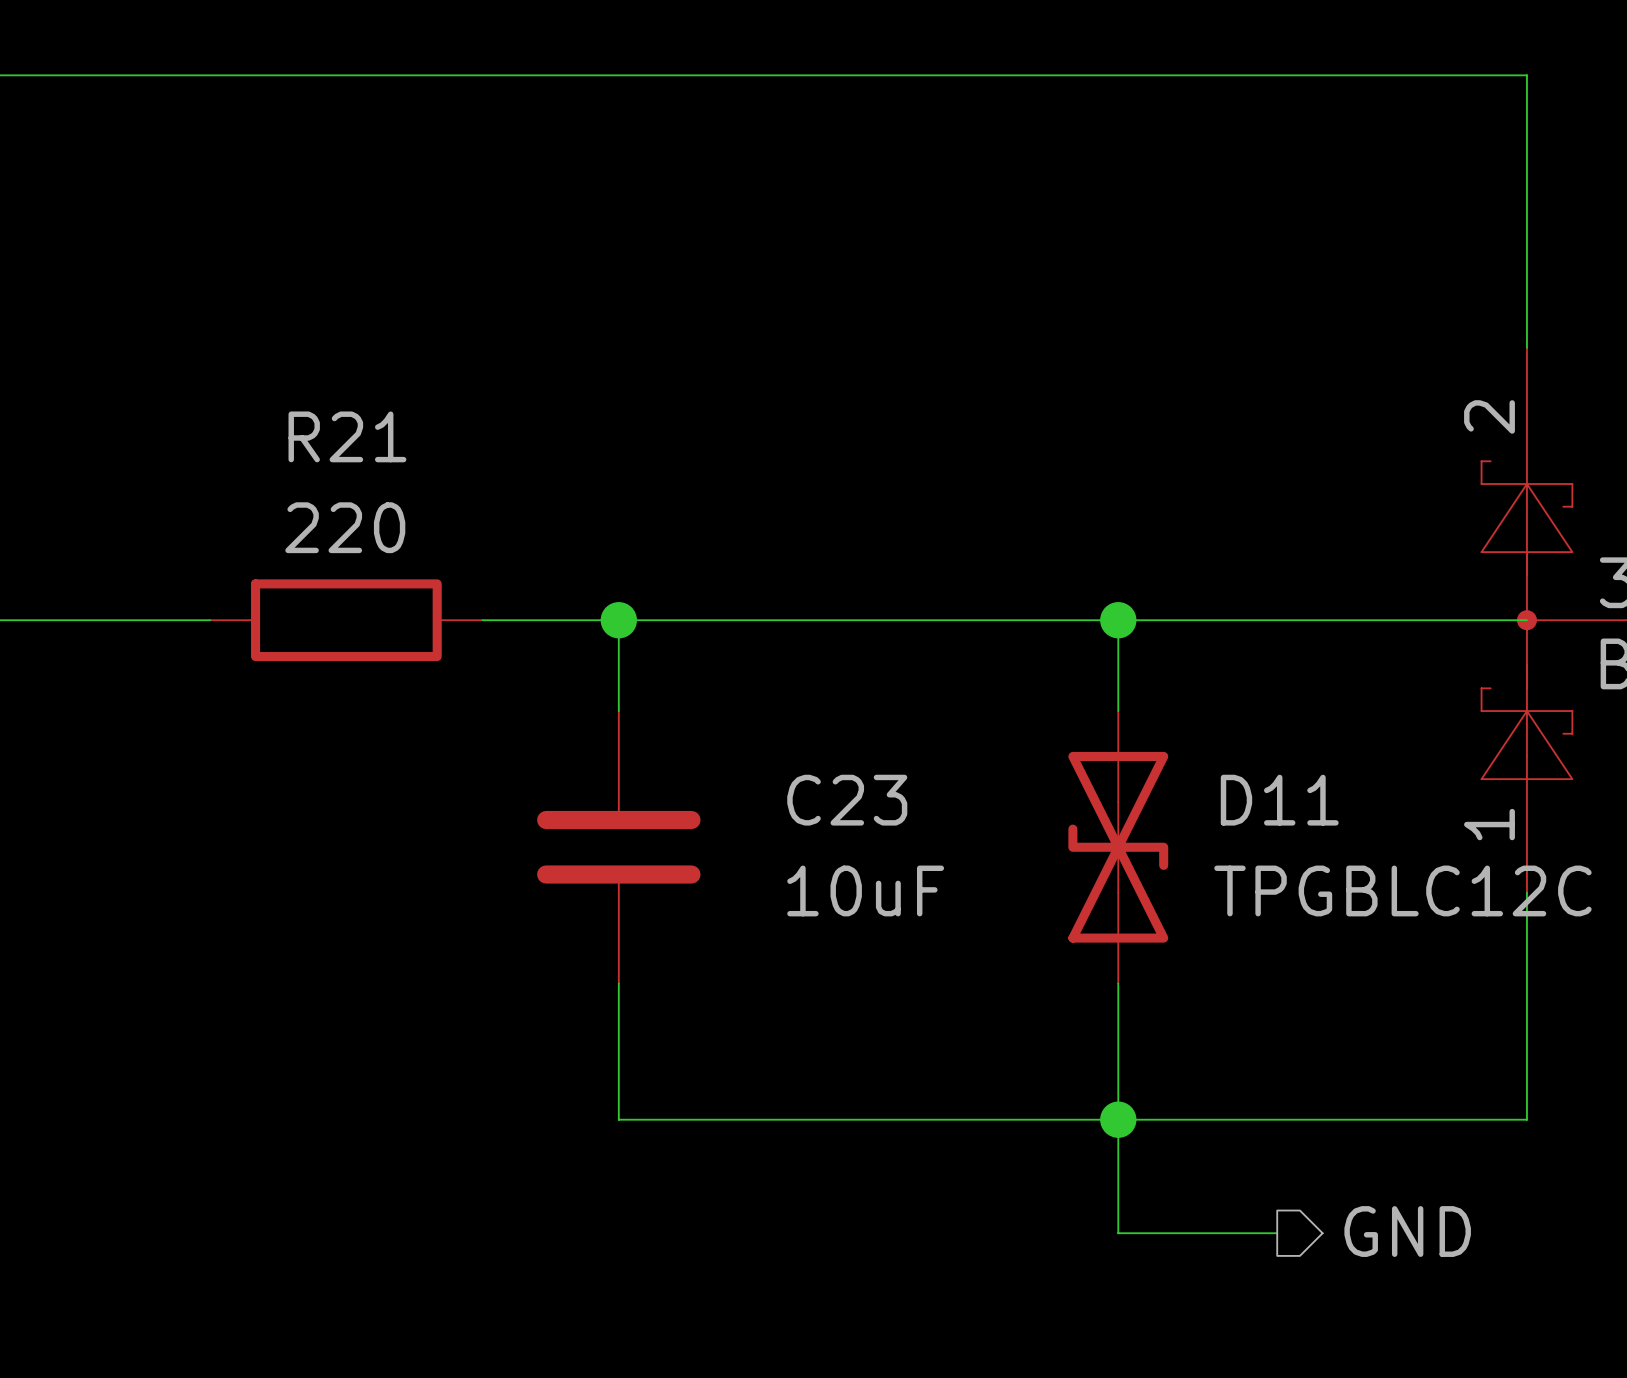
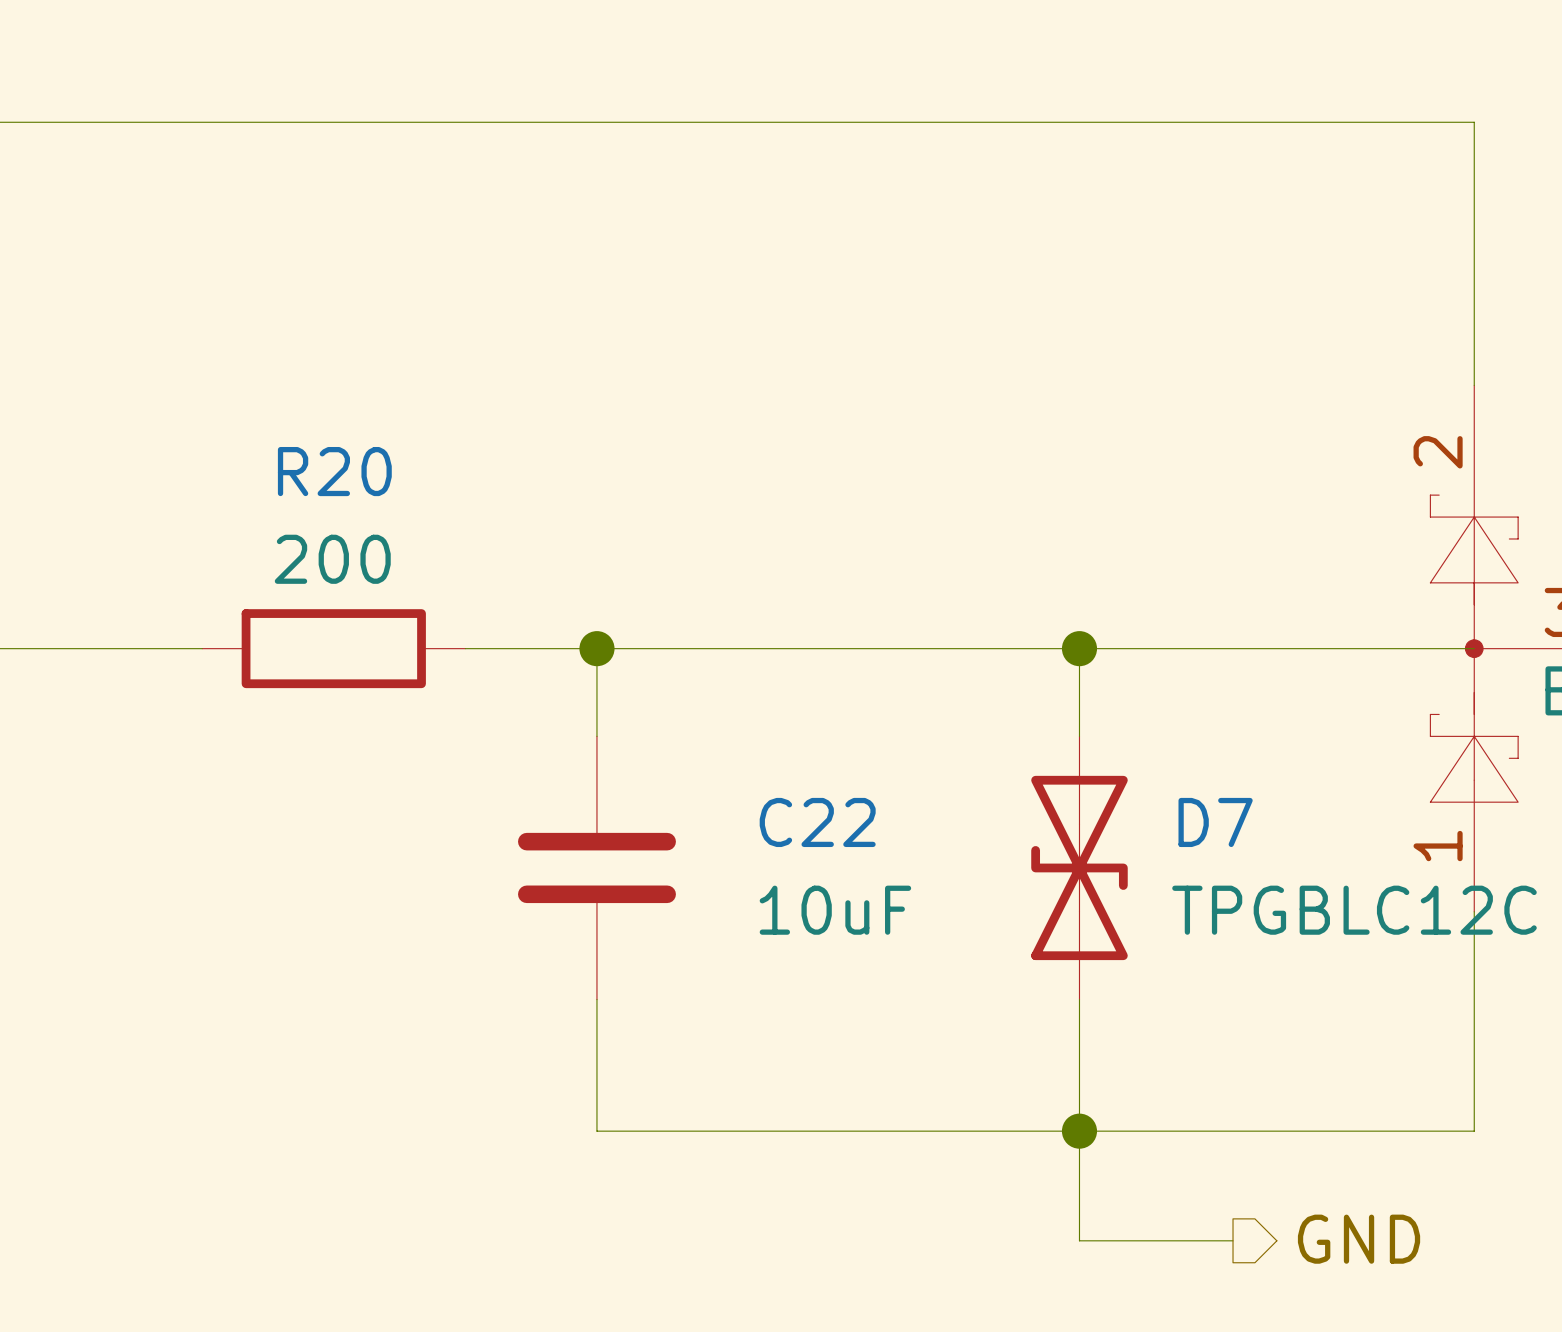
R21 name: R21 (347, 436) -> R20 (334, 471)
R21 value: 220 (345, 527) -> 200 (332, 559)
C23 name: C23 (847, 800) -> C22 (817, 822)
D11 name: D11 (1279, 800) -> D7 (1215, 822)

